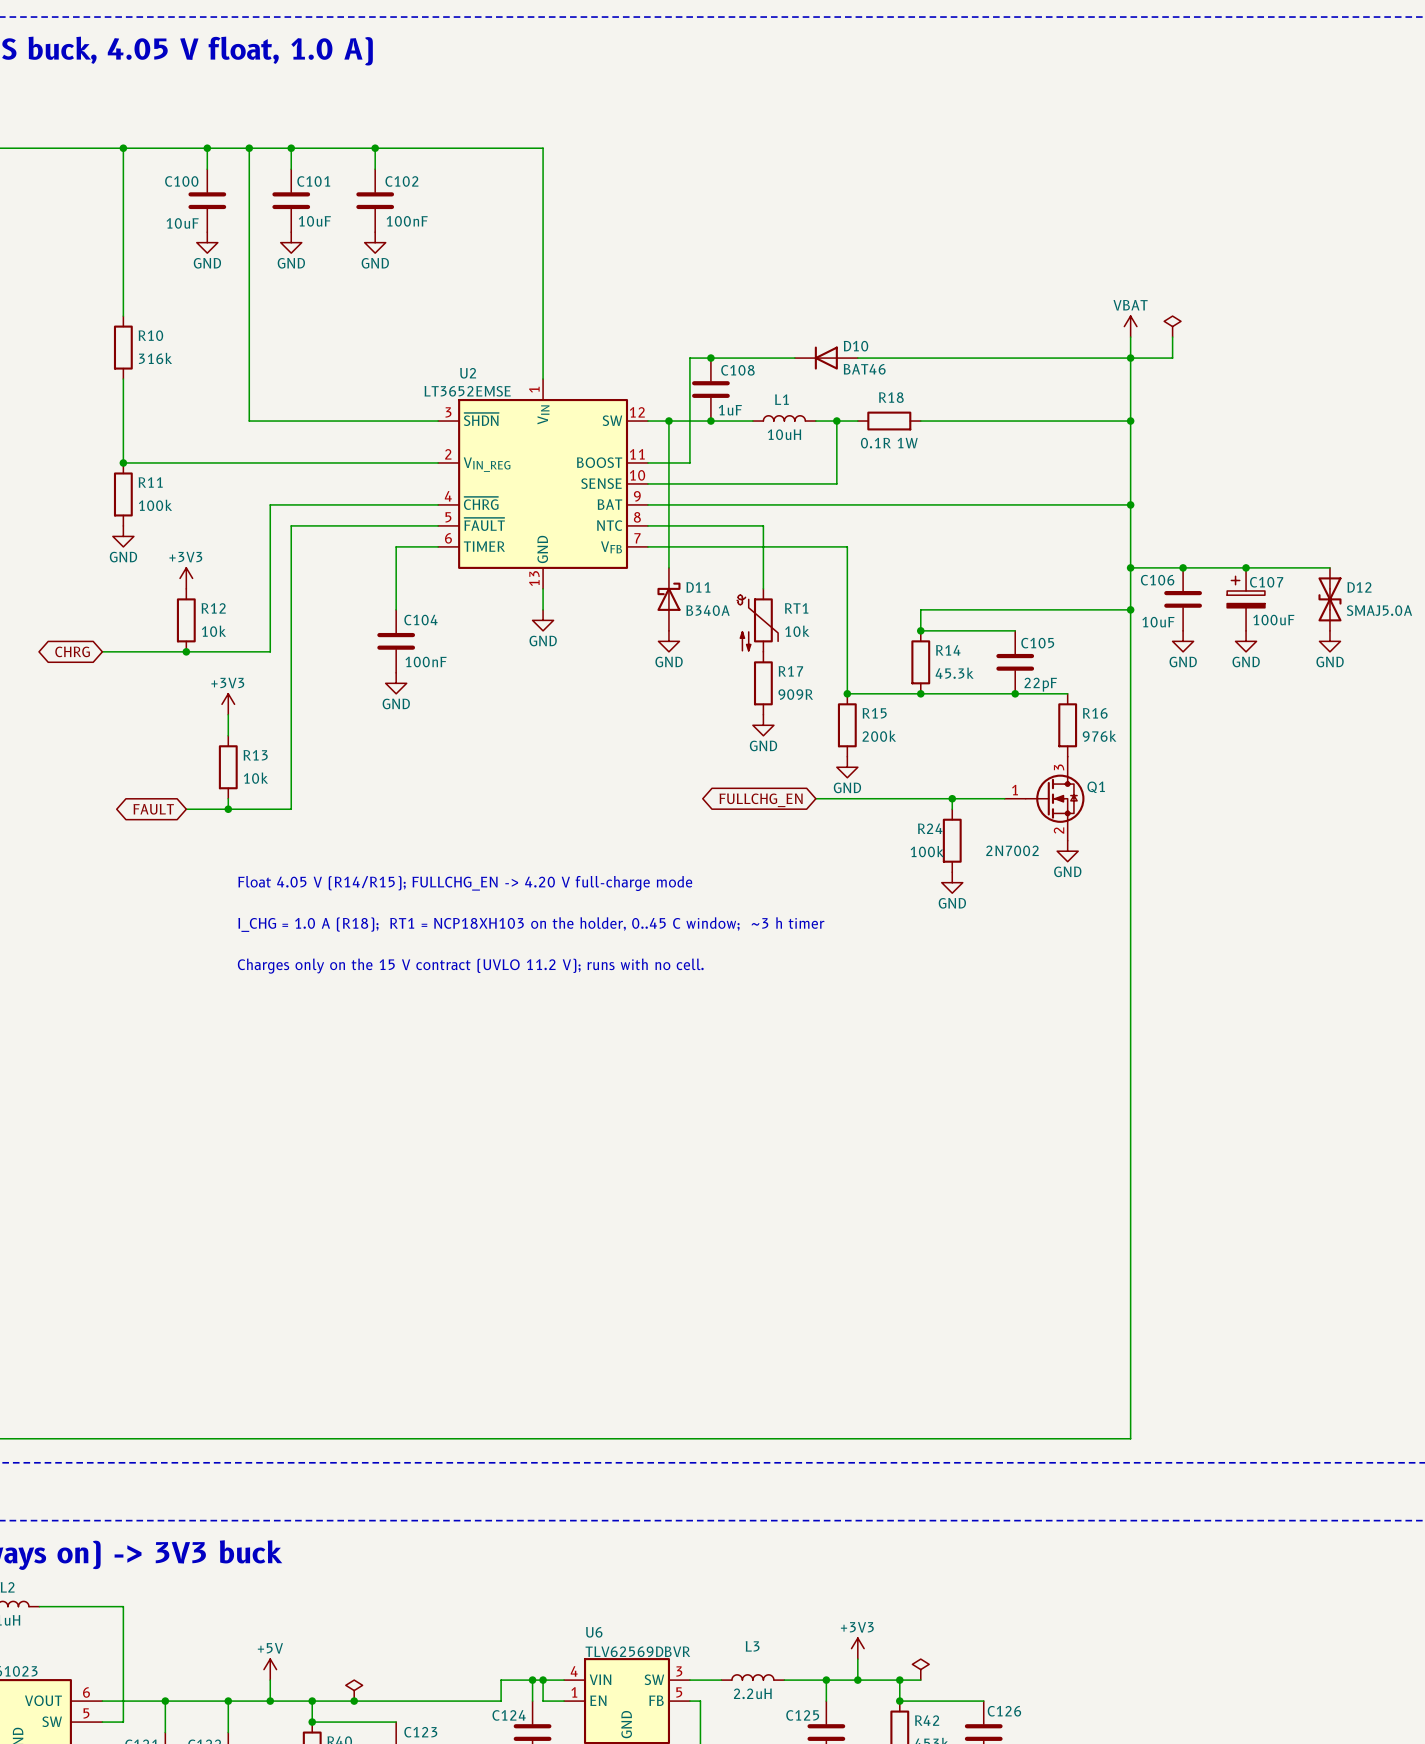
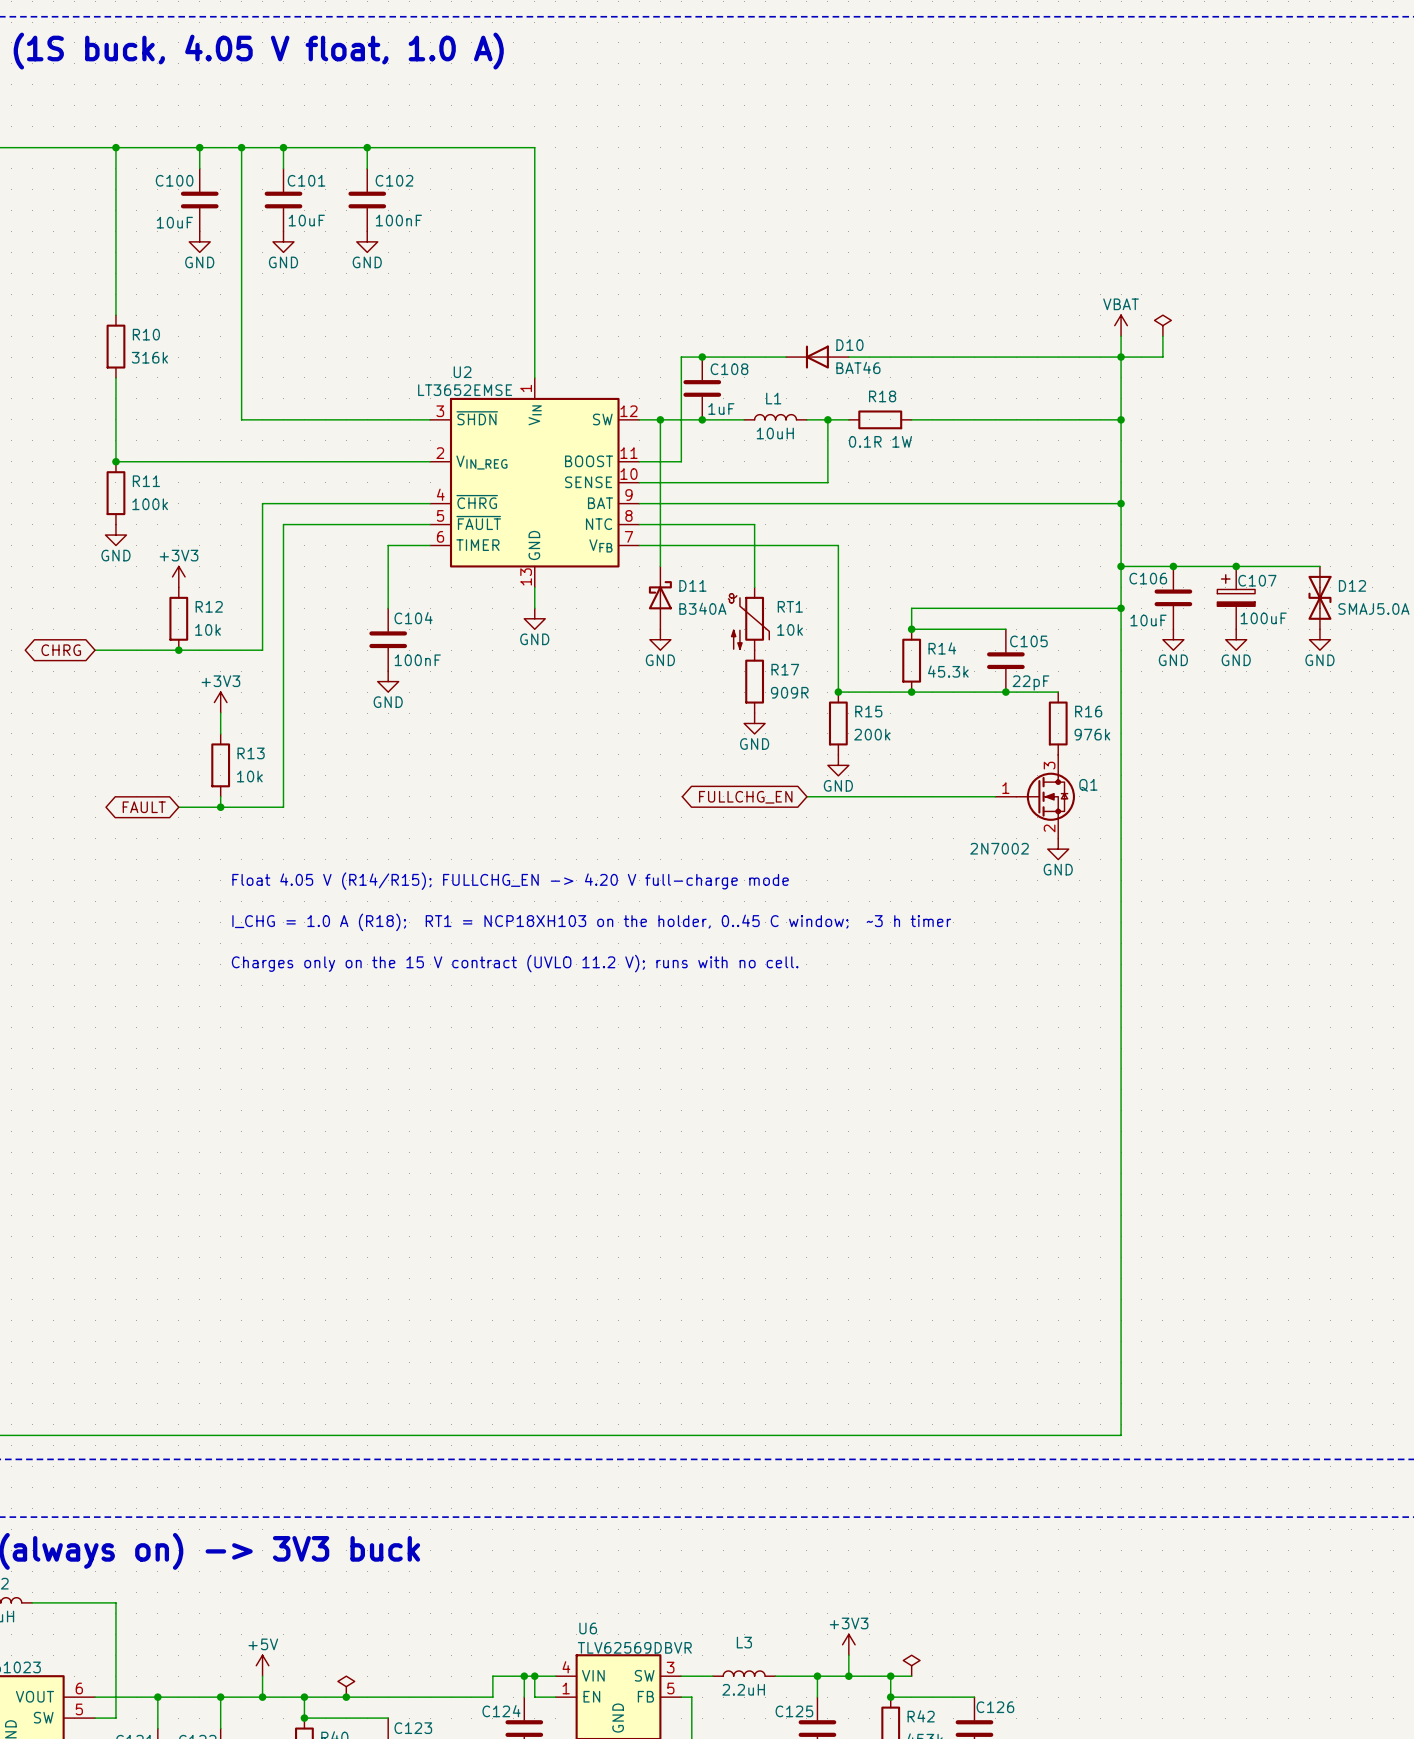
wire: (952, 798) (952, 809) -> none
junction: (952, 798) -> none
R24: 100k (952, 840) -> none
power symbol: GND (952, 882) -> none

